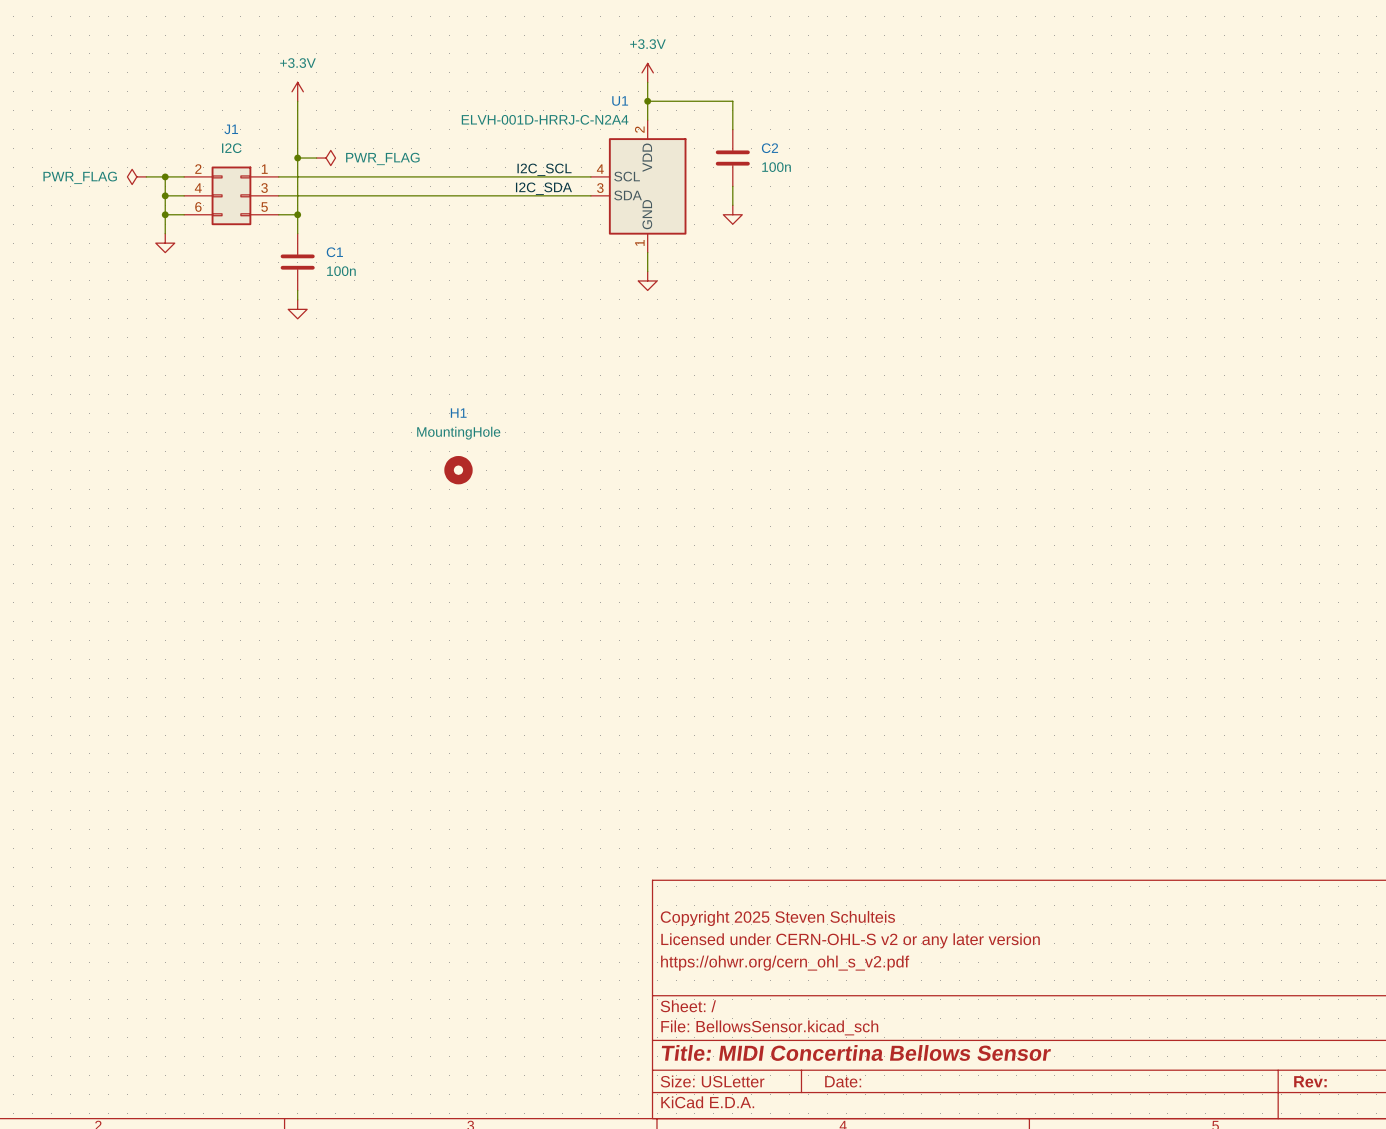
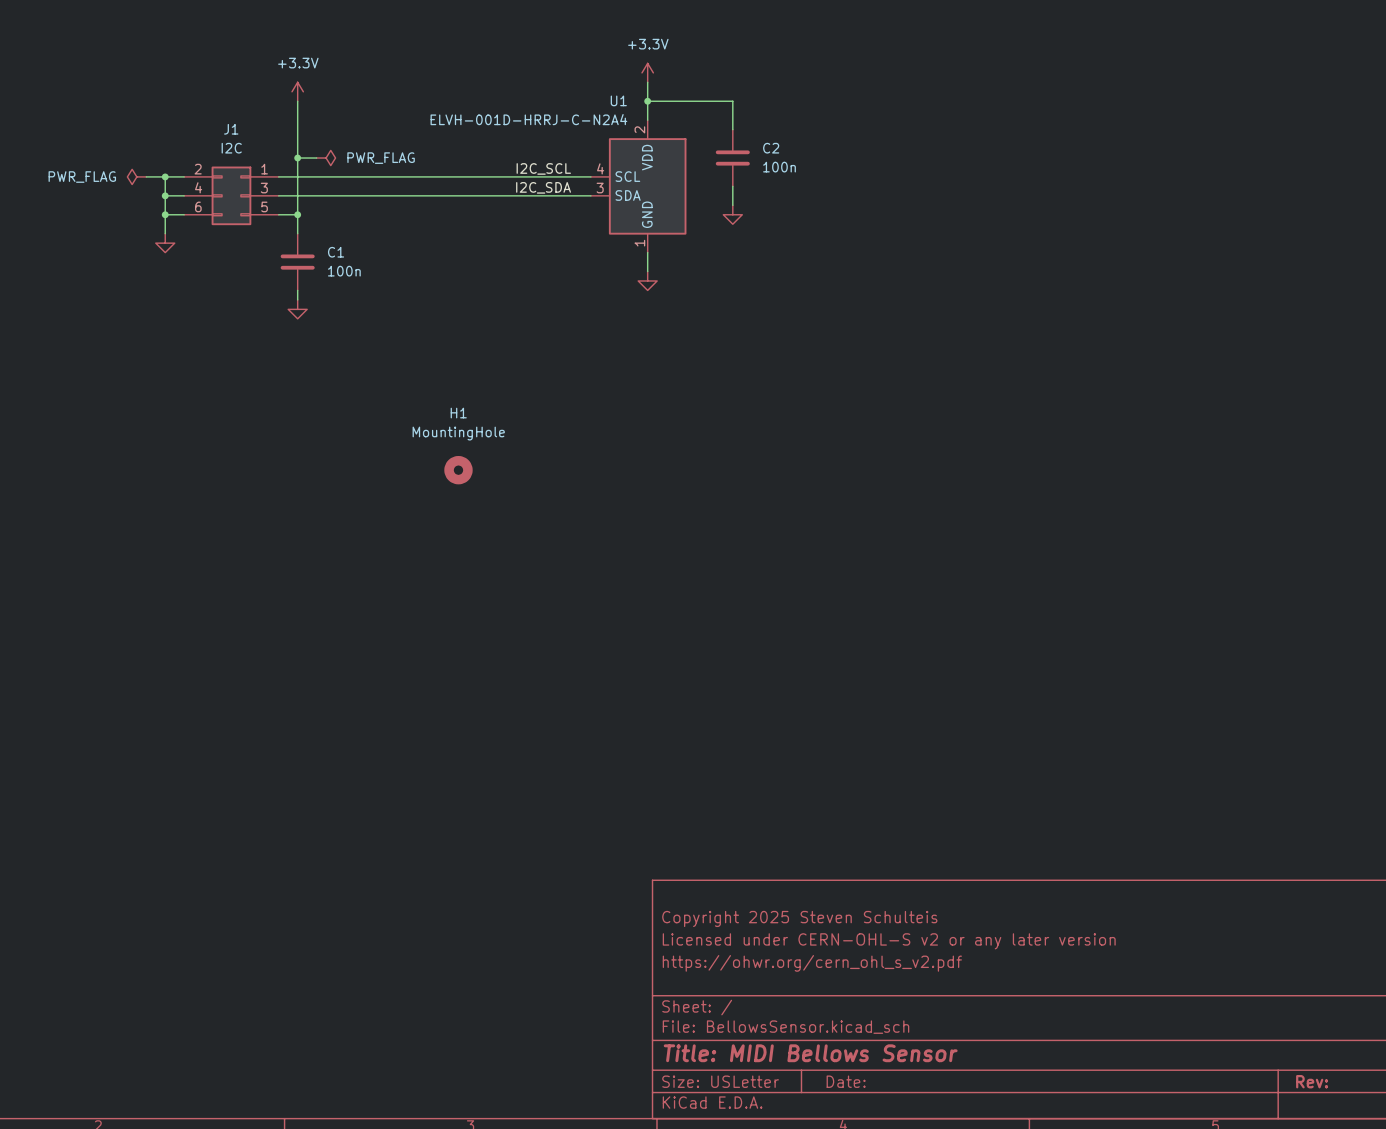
title block: Title: MIDI Concertina Bellows Sensor (856, 1052) -> Title: MIDI Bellows Sensor (810, 1053)

